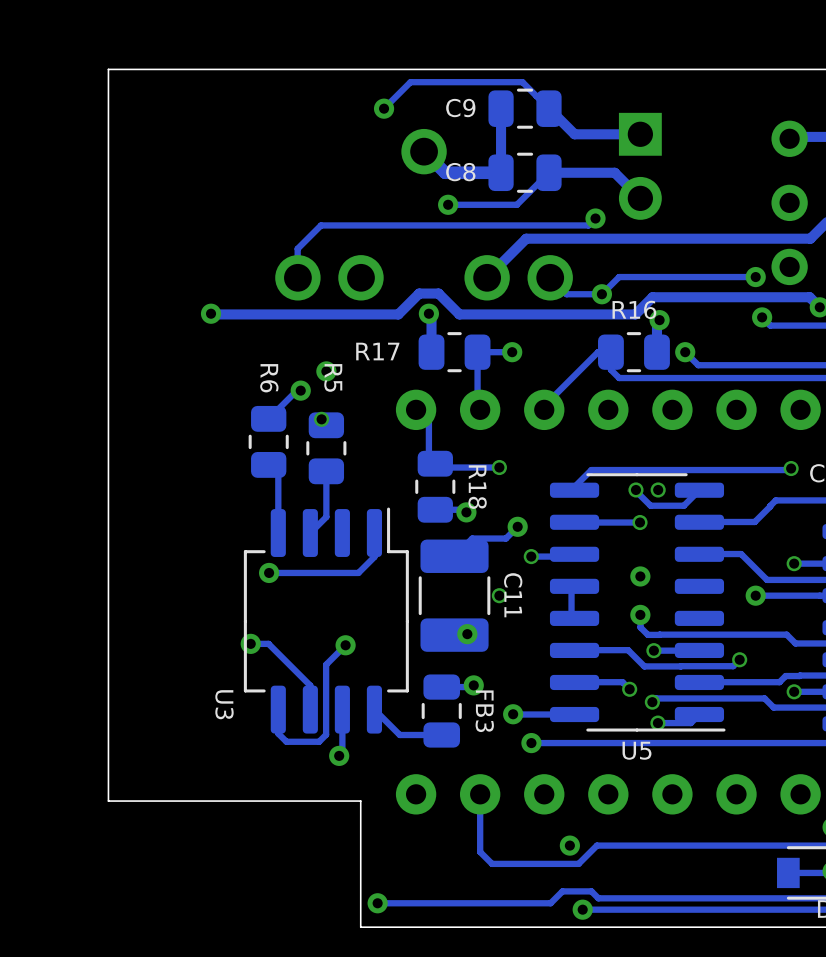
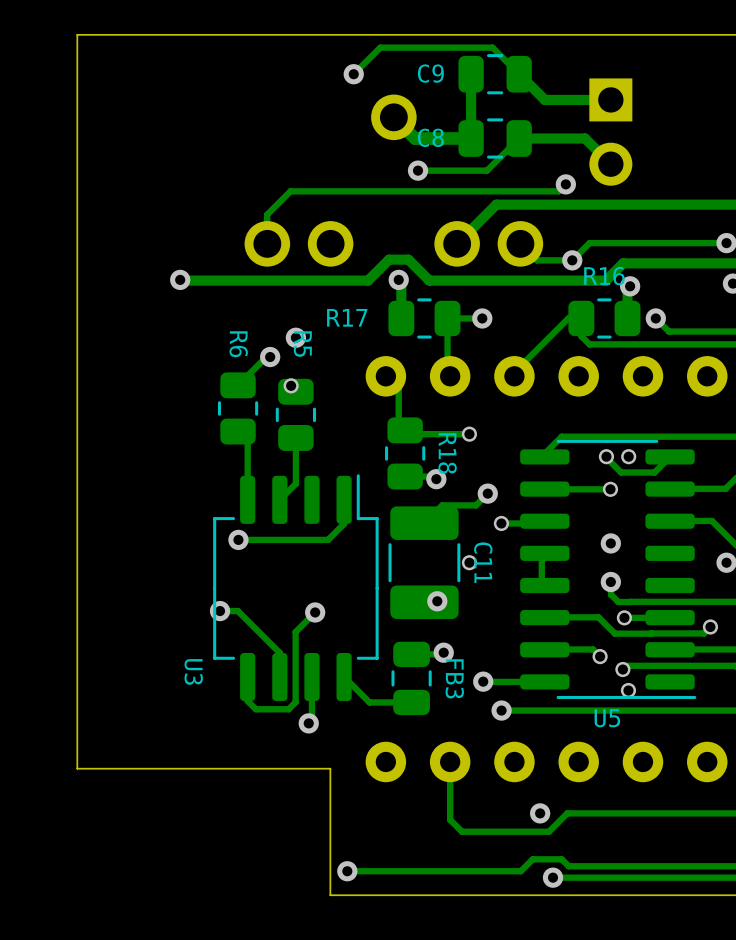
track: (699, 714) (690, 723) (657, 723) -> none

